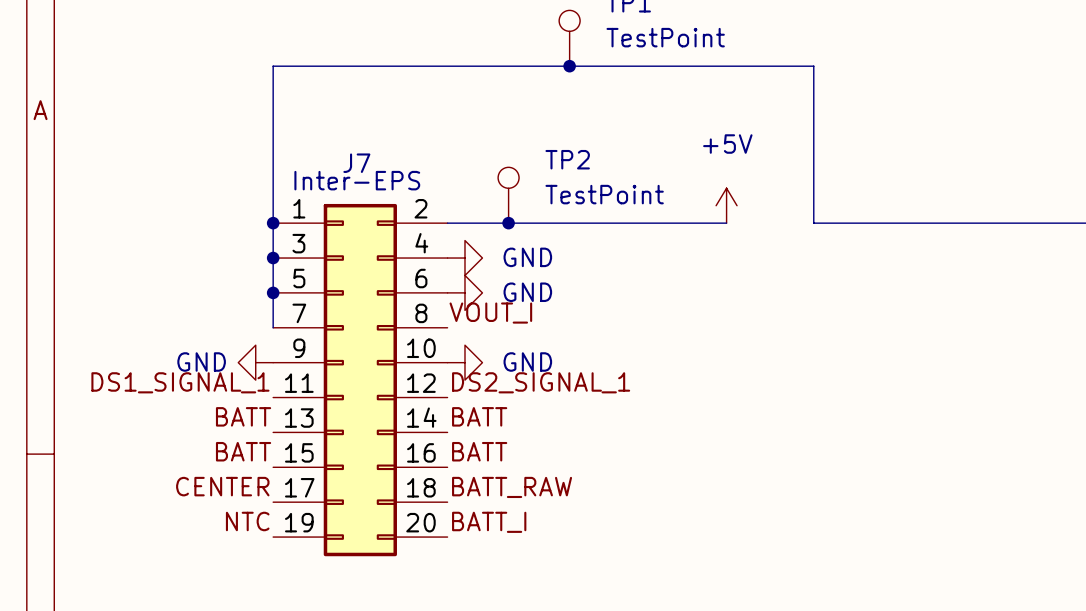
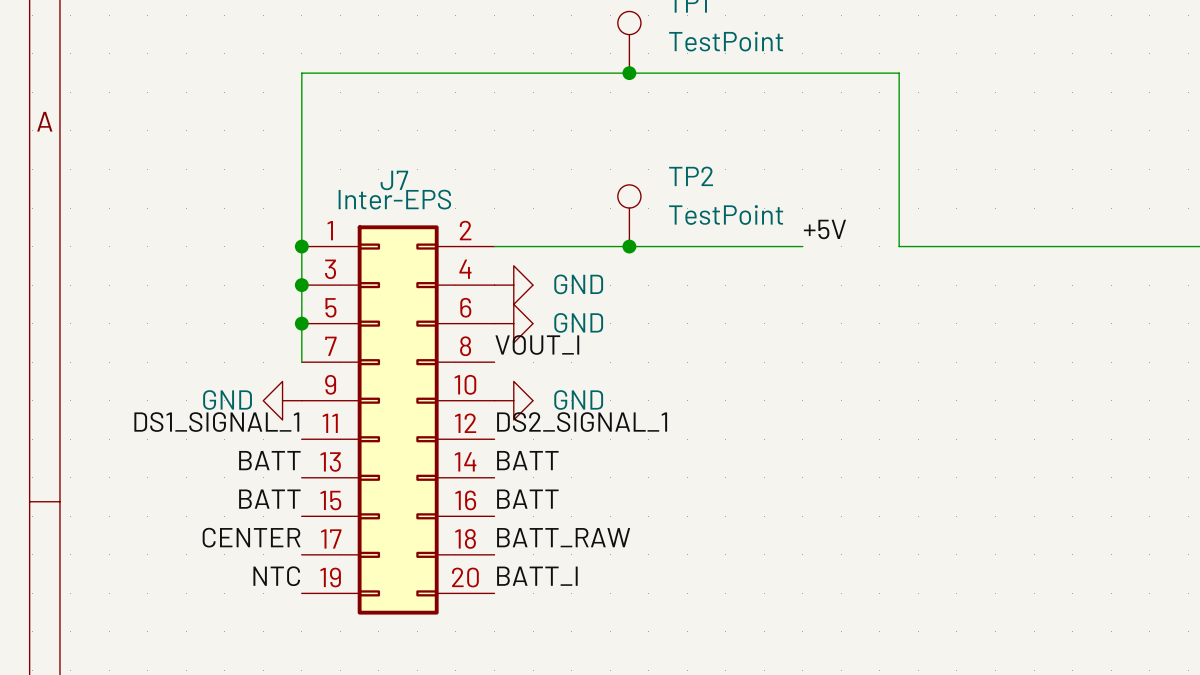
TP2 position: (508, 195) -> (629, 215)
power symbol: +5V (726, 205) -> none
label: none -> +5V (824, 229)
junction position: (508, 223) -> (629, 246)

